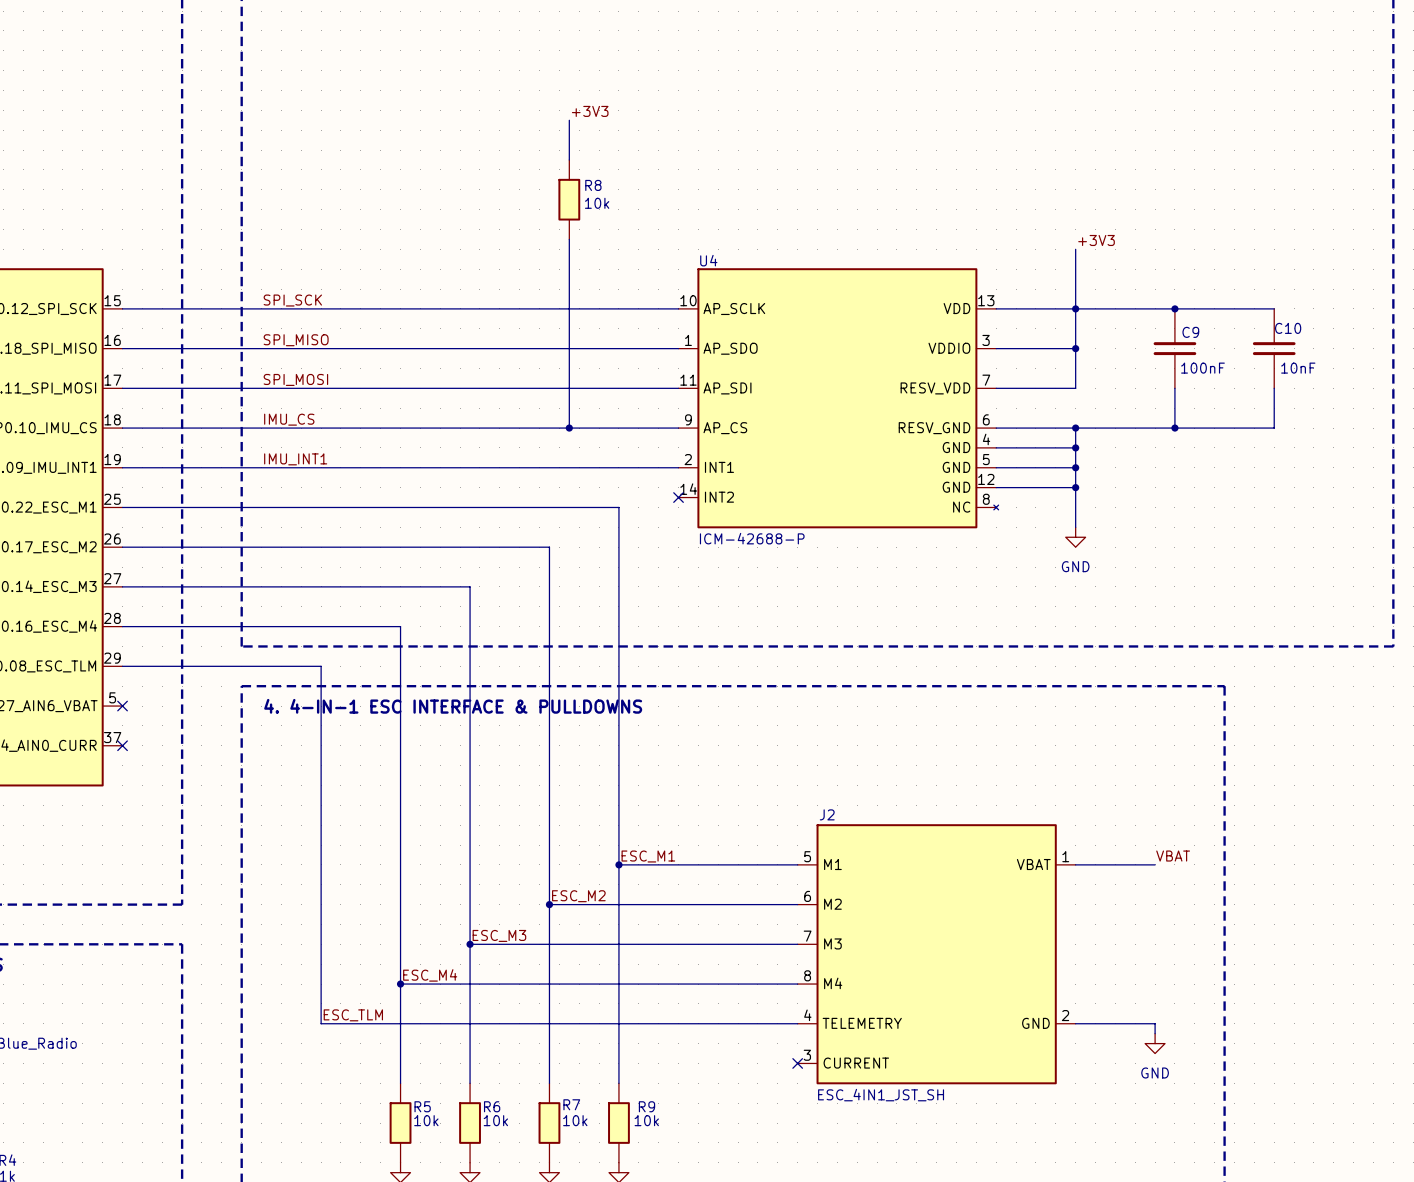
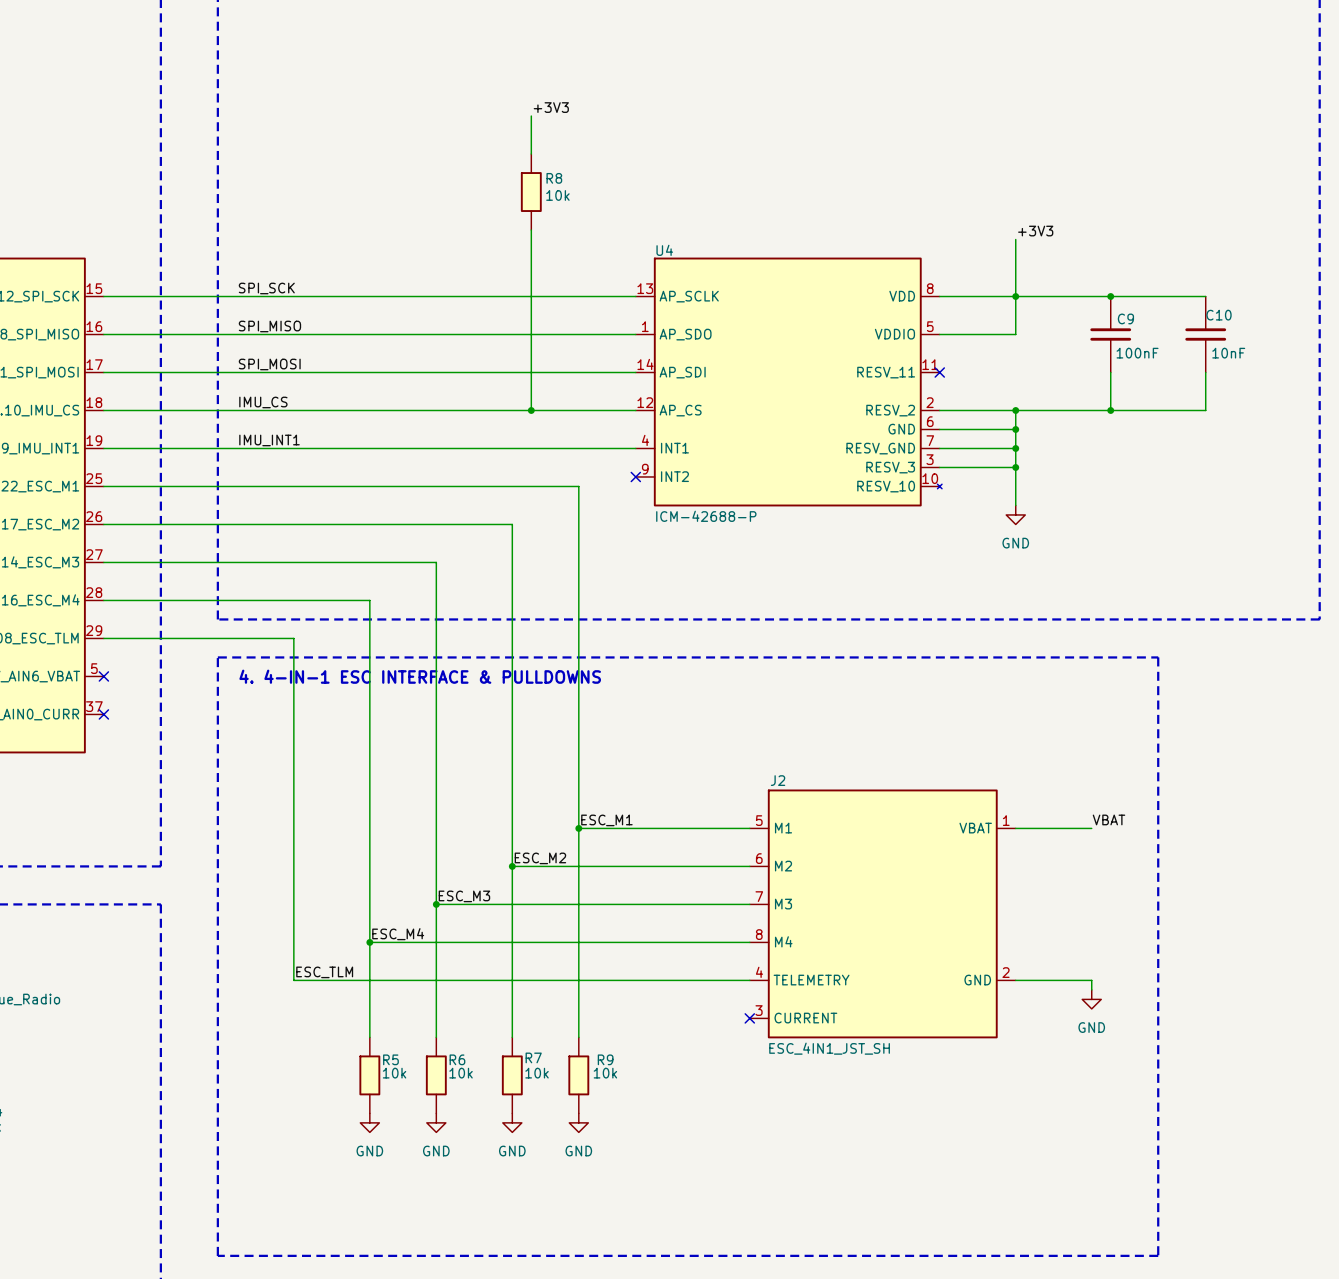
U4 symbol: [678, 268, 999, 529] -> [635, 257, 943, 507]
wire: (1075, 348) (1075, 388) (996, 388) -> none
junction: (1075, 348) -> none
no-connect mark: none -> (939, 372)

